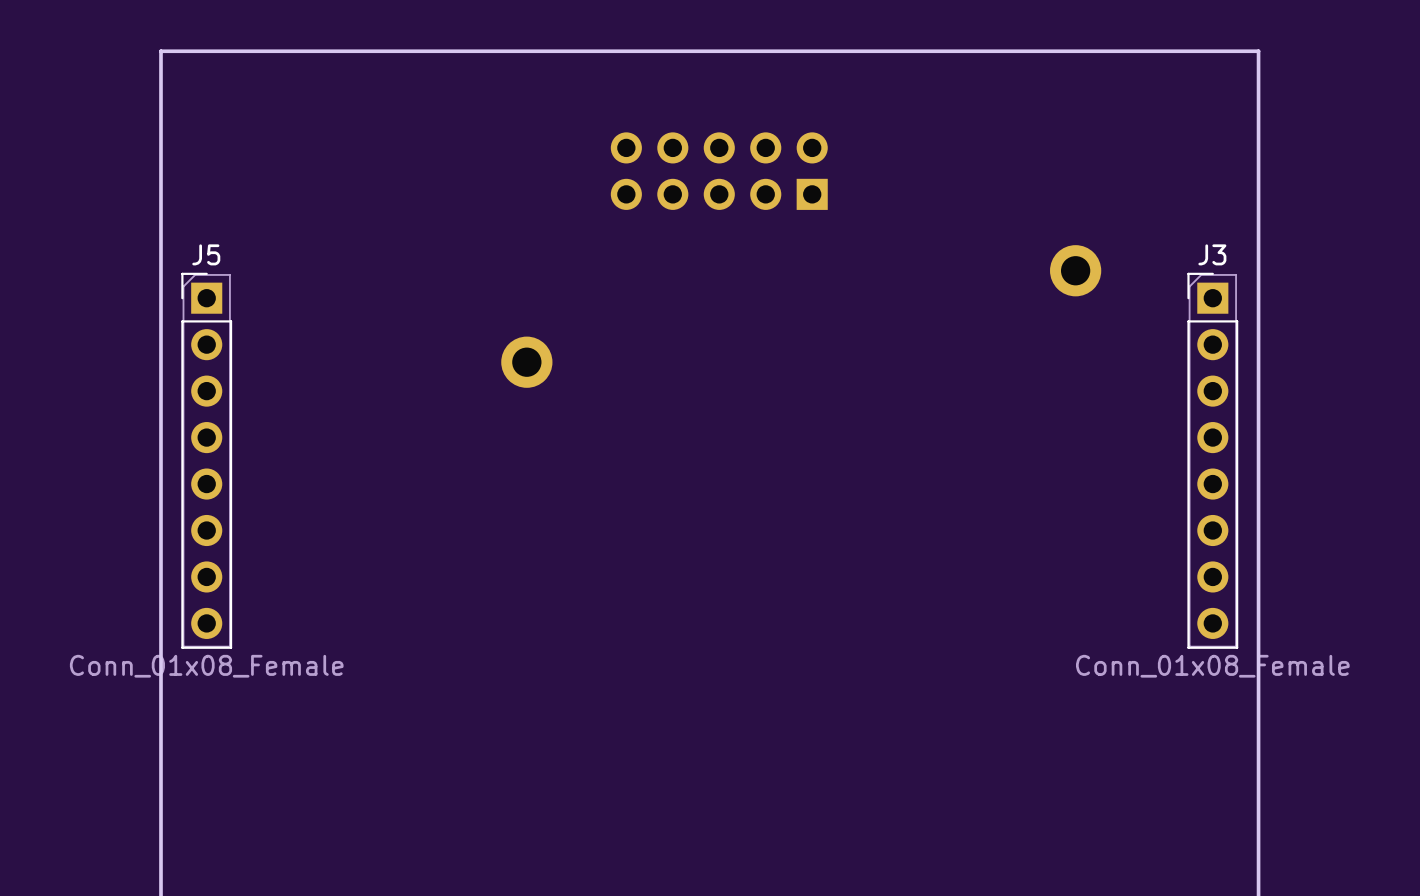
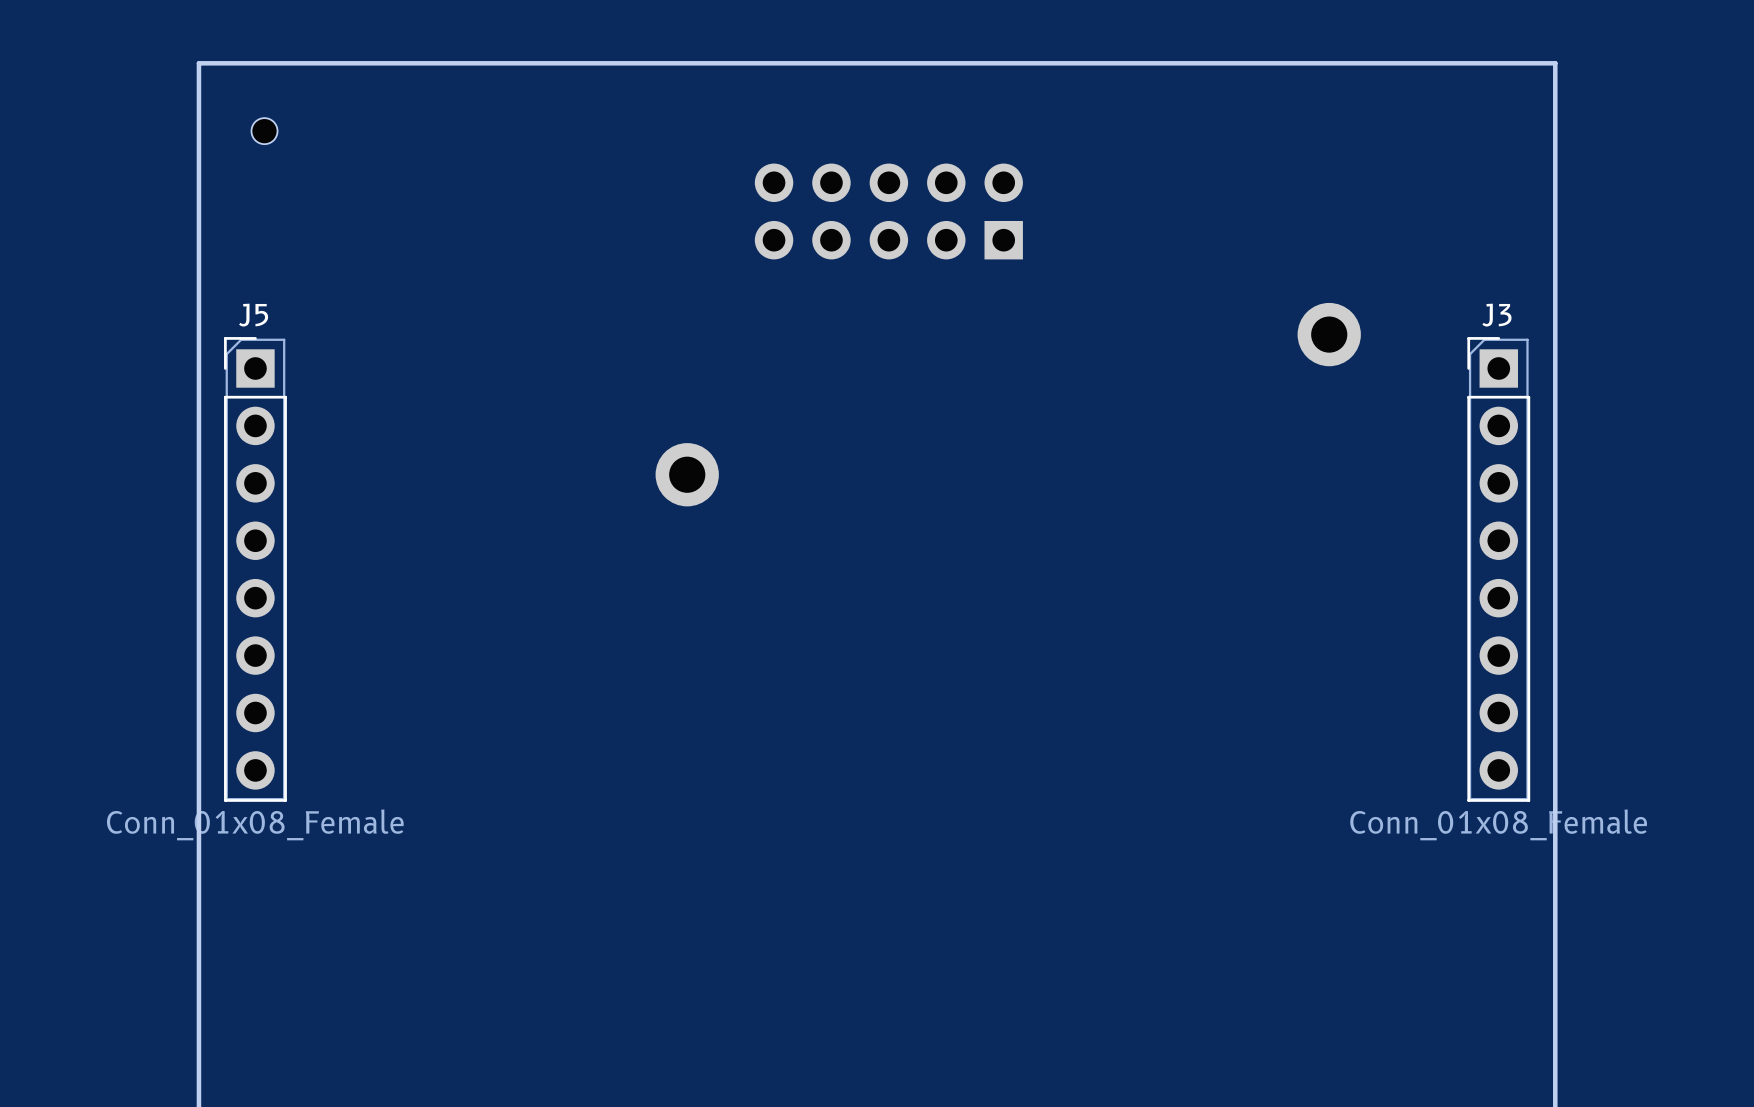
part: none -> (264, 131)
part position: (526, 362) -> (687, 474)

